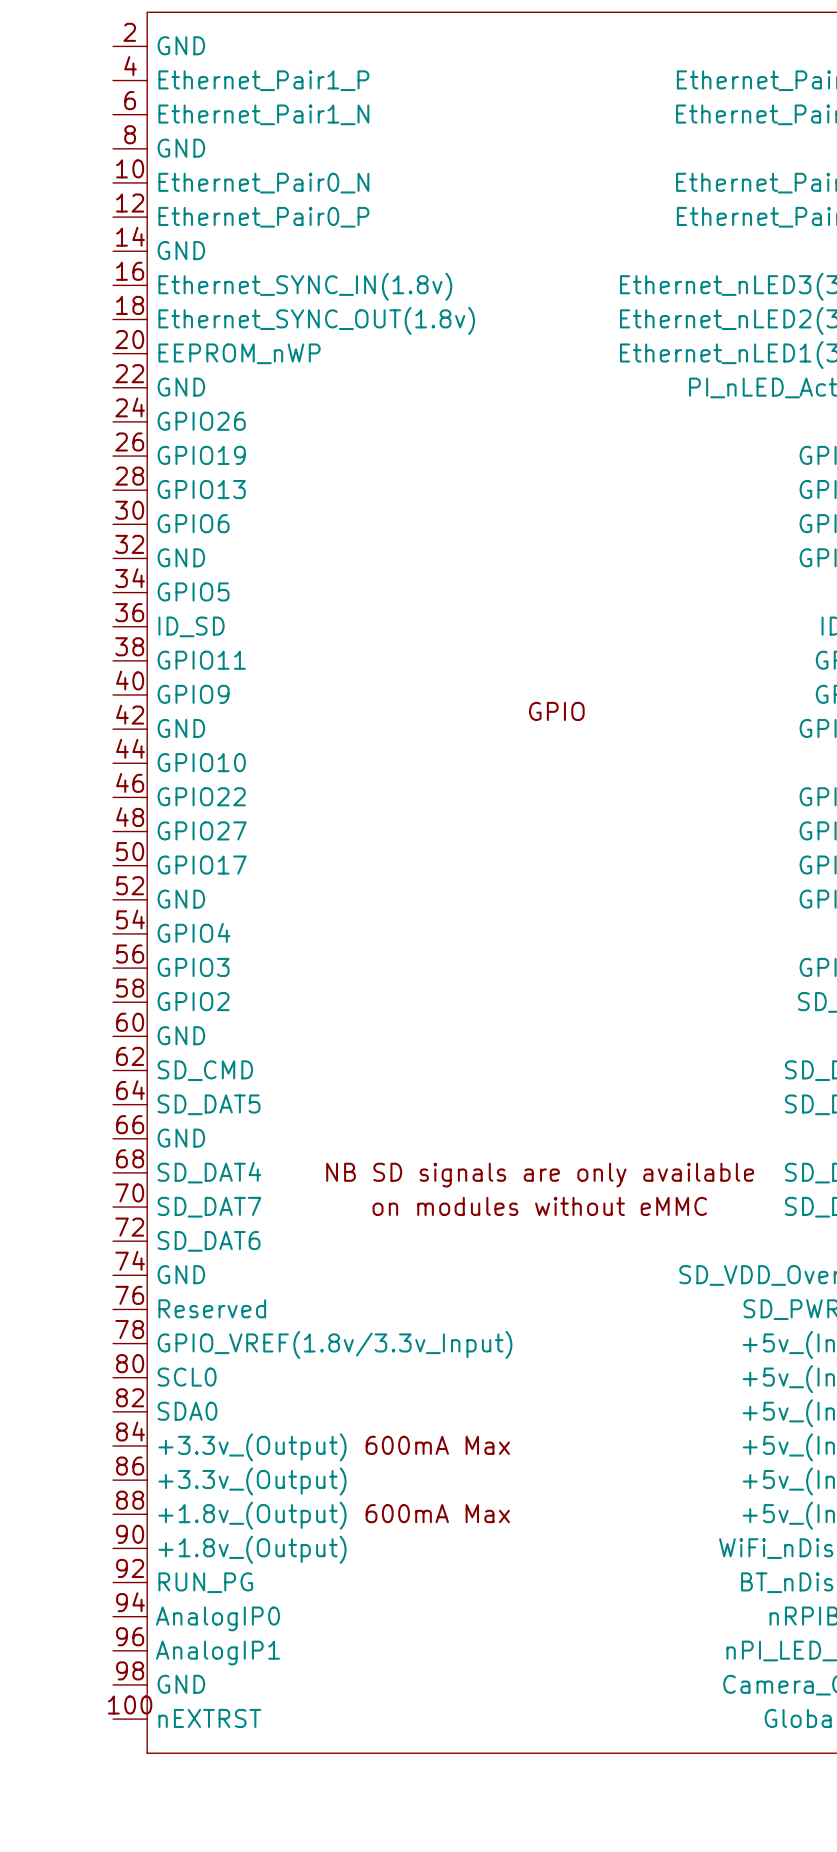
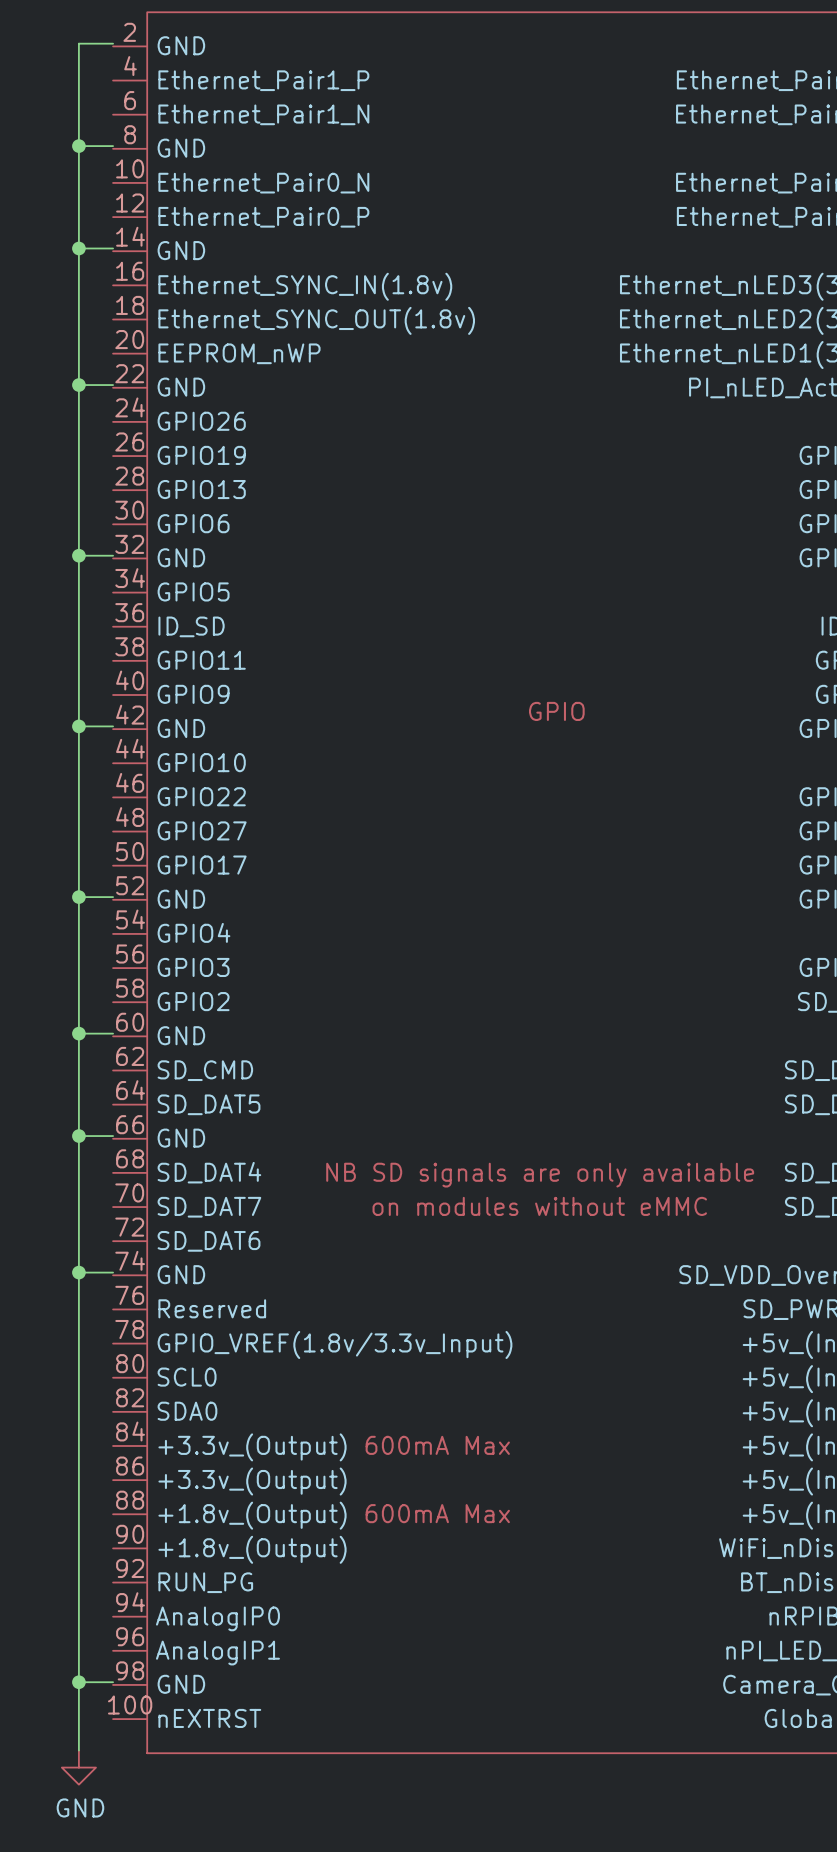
wire: none -> (113, 43) (78, 43) (78, 1750)
wire: none -> (78, 146) (113, 146)
junction: none -> (78, 146)
wire: none -> (78, 248) (113, 248)
junction: none -> (78, 248)
wire: none -> (78, 385) (113, 385)
junction: none -> (78, 385)
wire: none -> (78, 555) (113, 555)
junction: none -> (78, 555)
wire: none -> (78, 726) (113, 726)
junction: none -> (78, 726)
wire: none -> (78, 897) (113, 897)
junction: none -> (78, 897)
wire: none -> (78, 1033) (113, 1033)
junction: none -> (78, 1033)
wire: none -> (78, 1136) (113, 1136)
junction: none -> (78, 1136)
wire: none -> (78, 1272) (113, 1272)
junction: none -> (78, 1272)
wire: none -> (78, 1682) (113, 1682)
junction: none -> (78, 1682)
power symbol: none -> GND (78, 1767)

